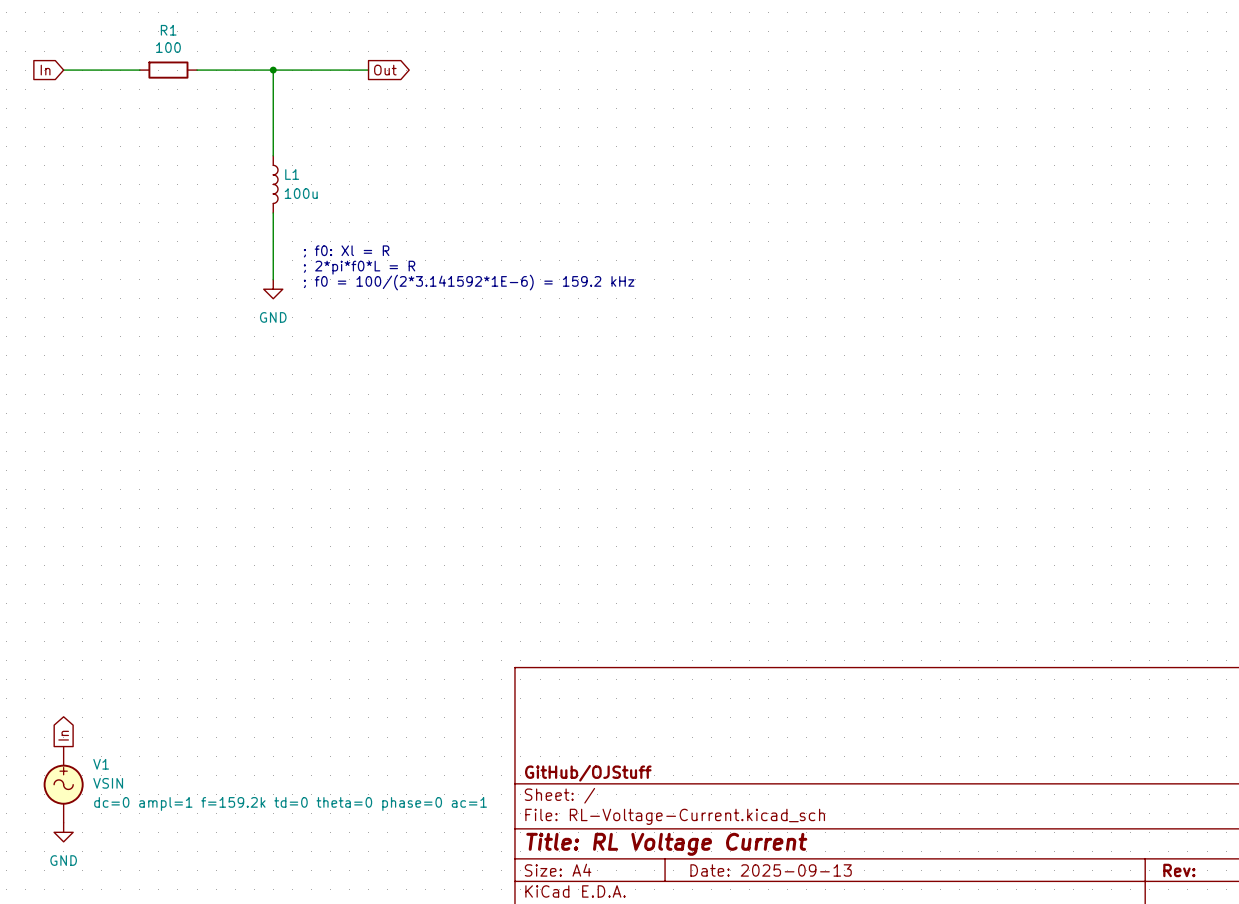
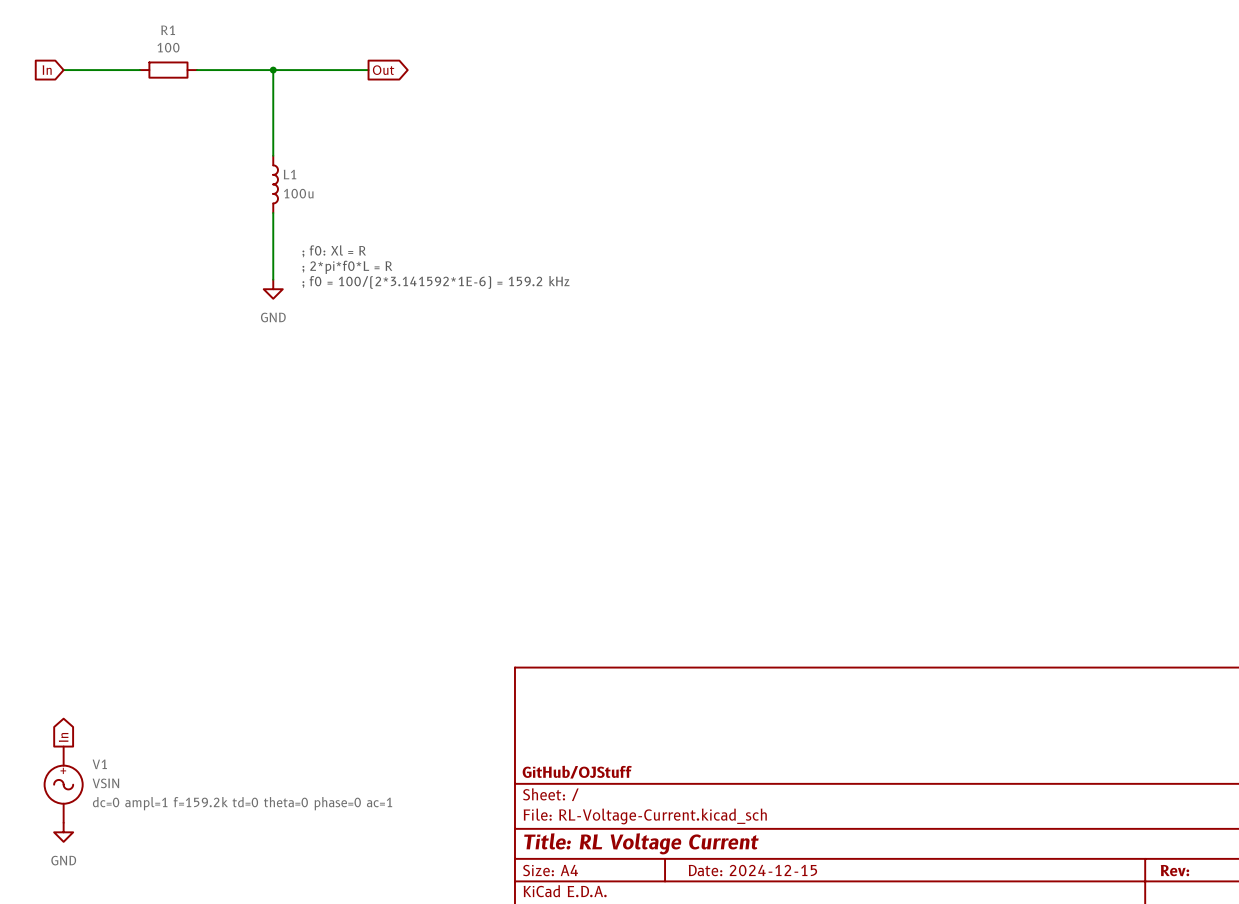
title block: Date: 2025-09-13 (771, 870) -> Date: 2024-12-15 (752, 870)

